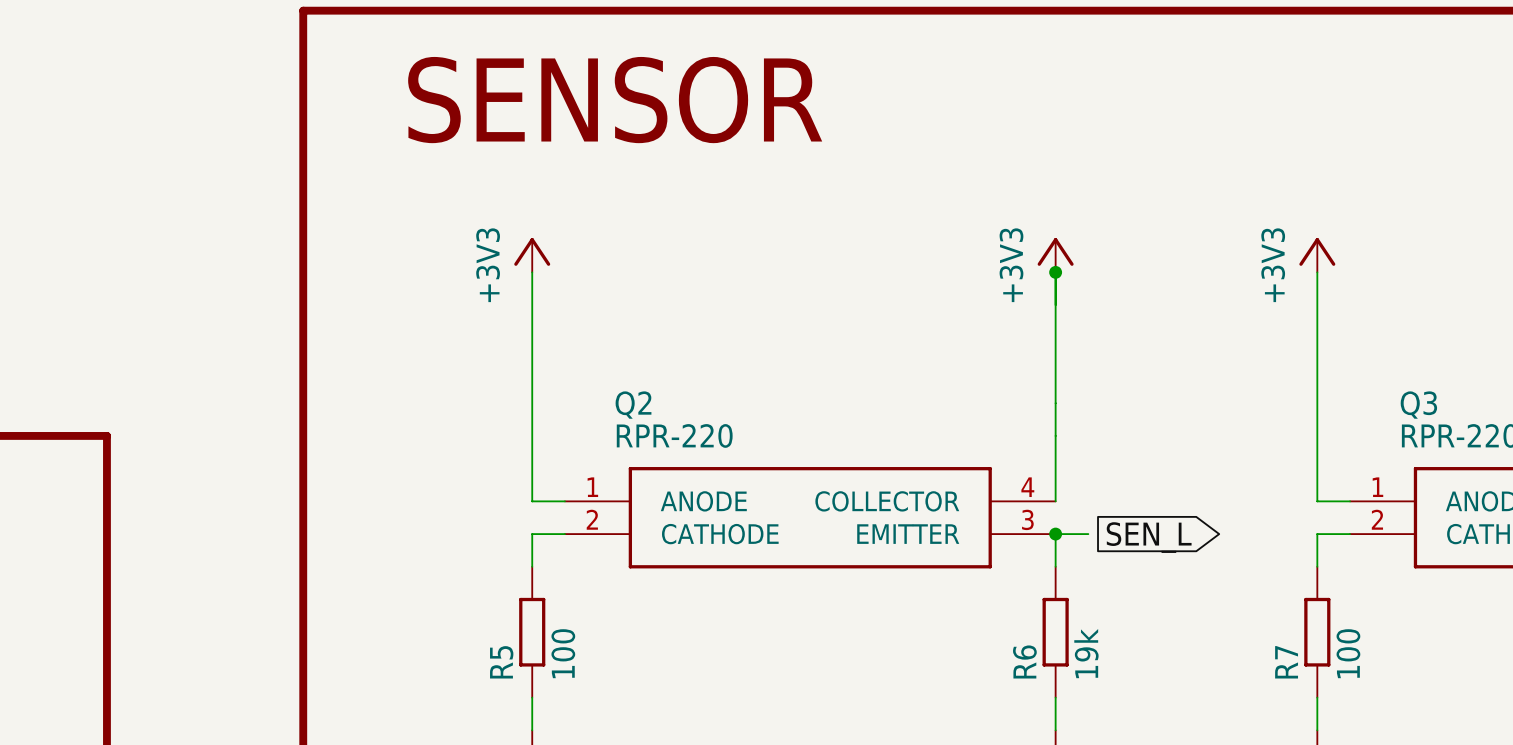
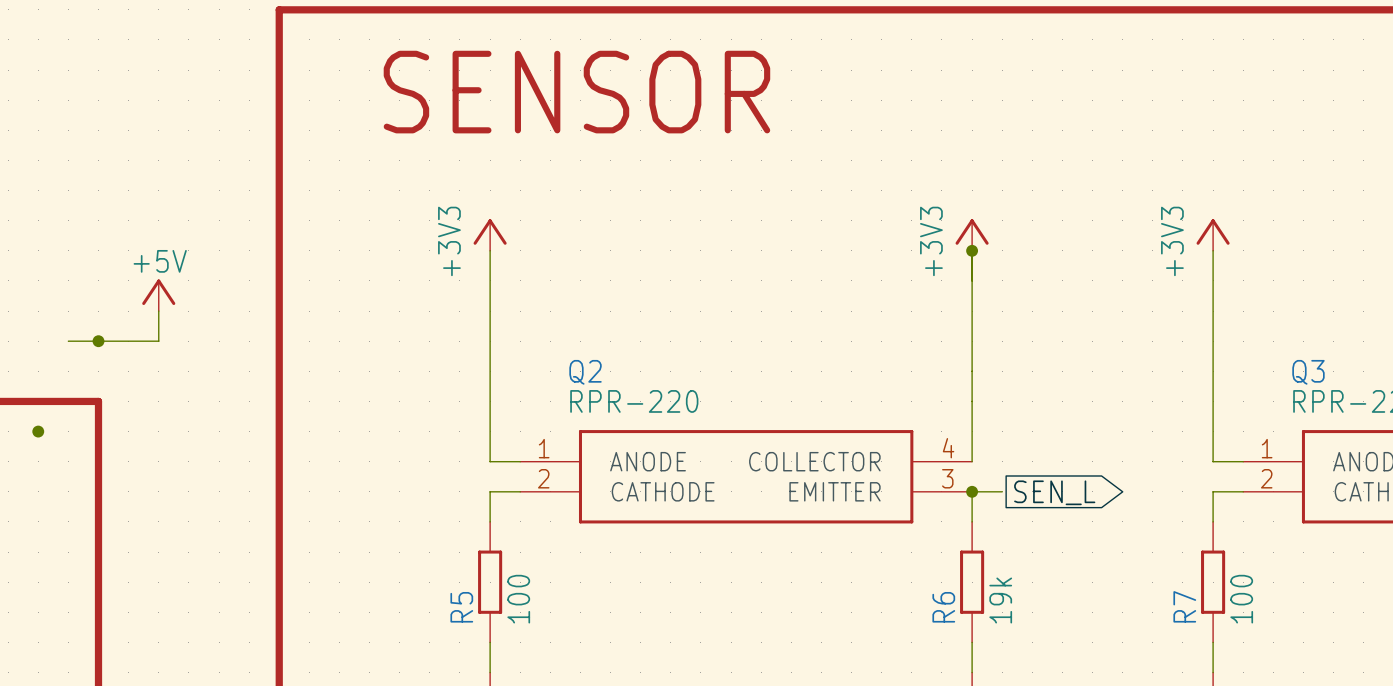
power symbol: none -> +5V (158, 295)
wire: none -> (158, 311) (158, 341) (68, 341)
junction: none -> (98, 341)
junction: none -> (38, 431)

